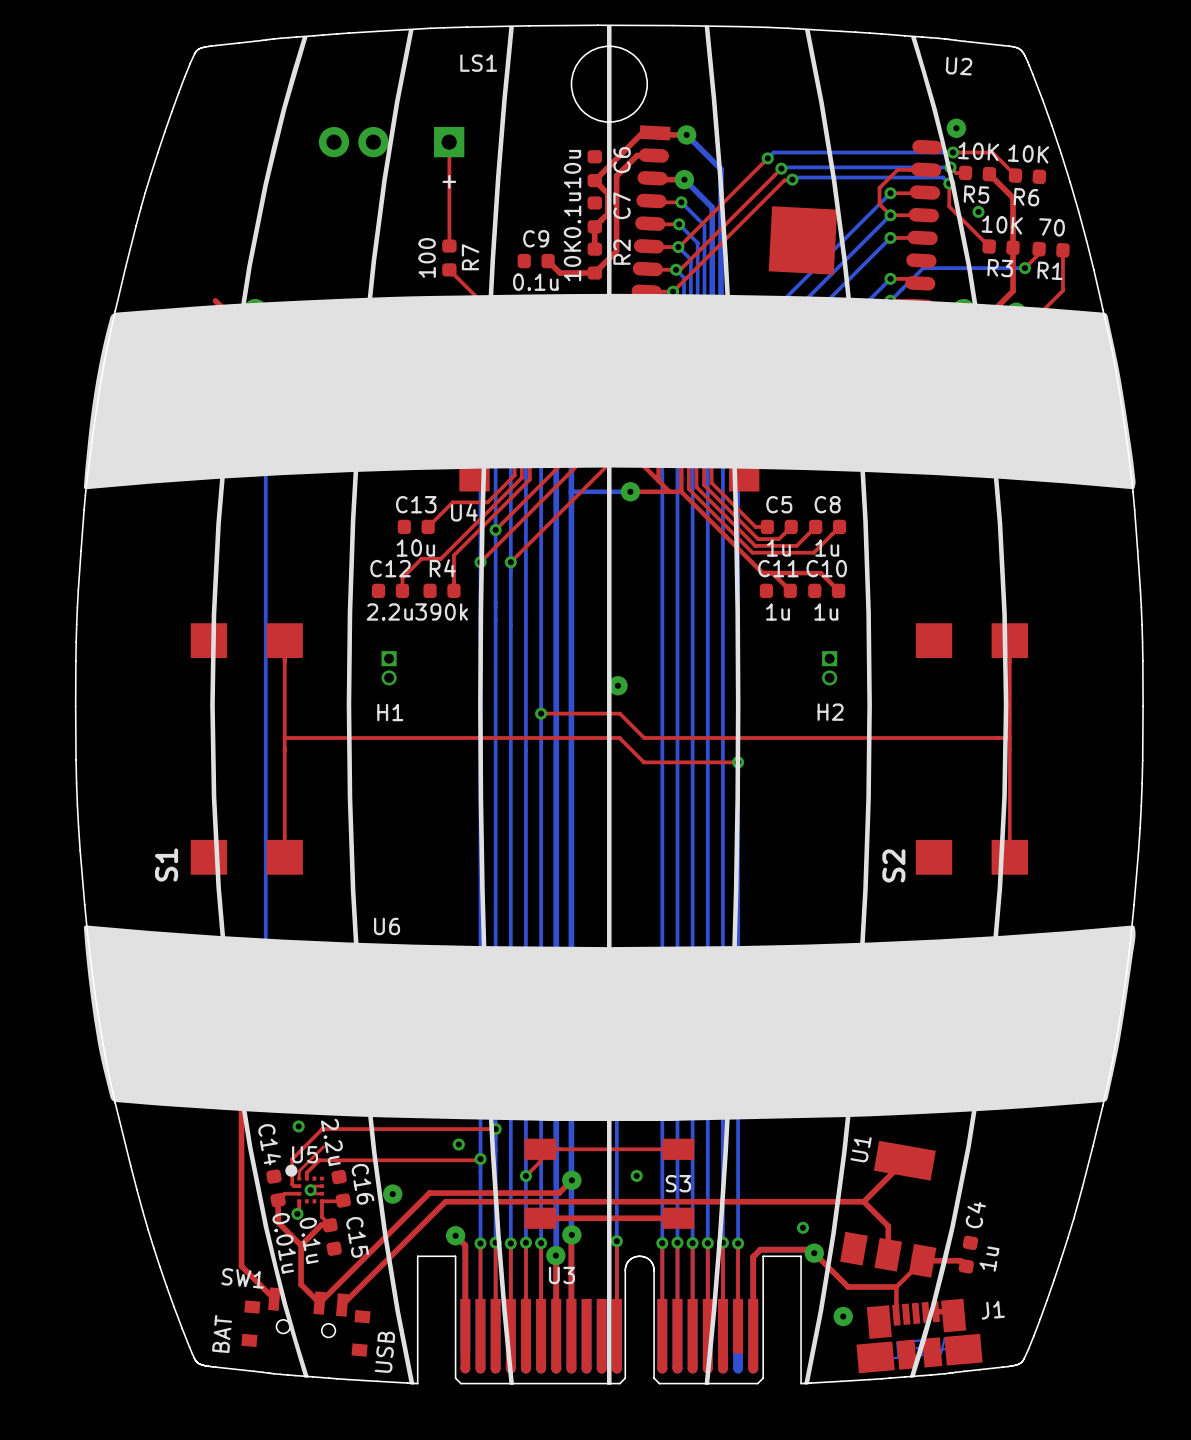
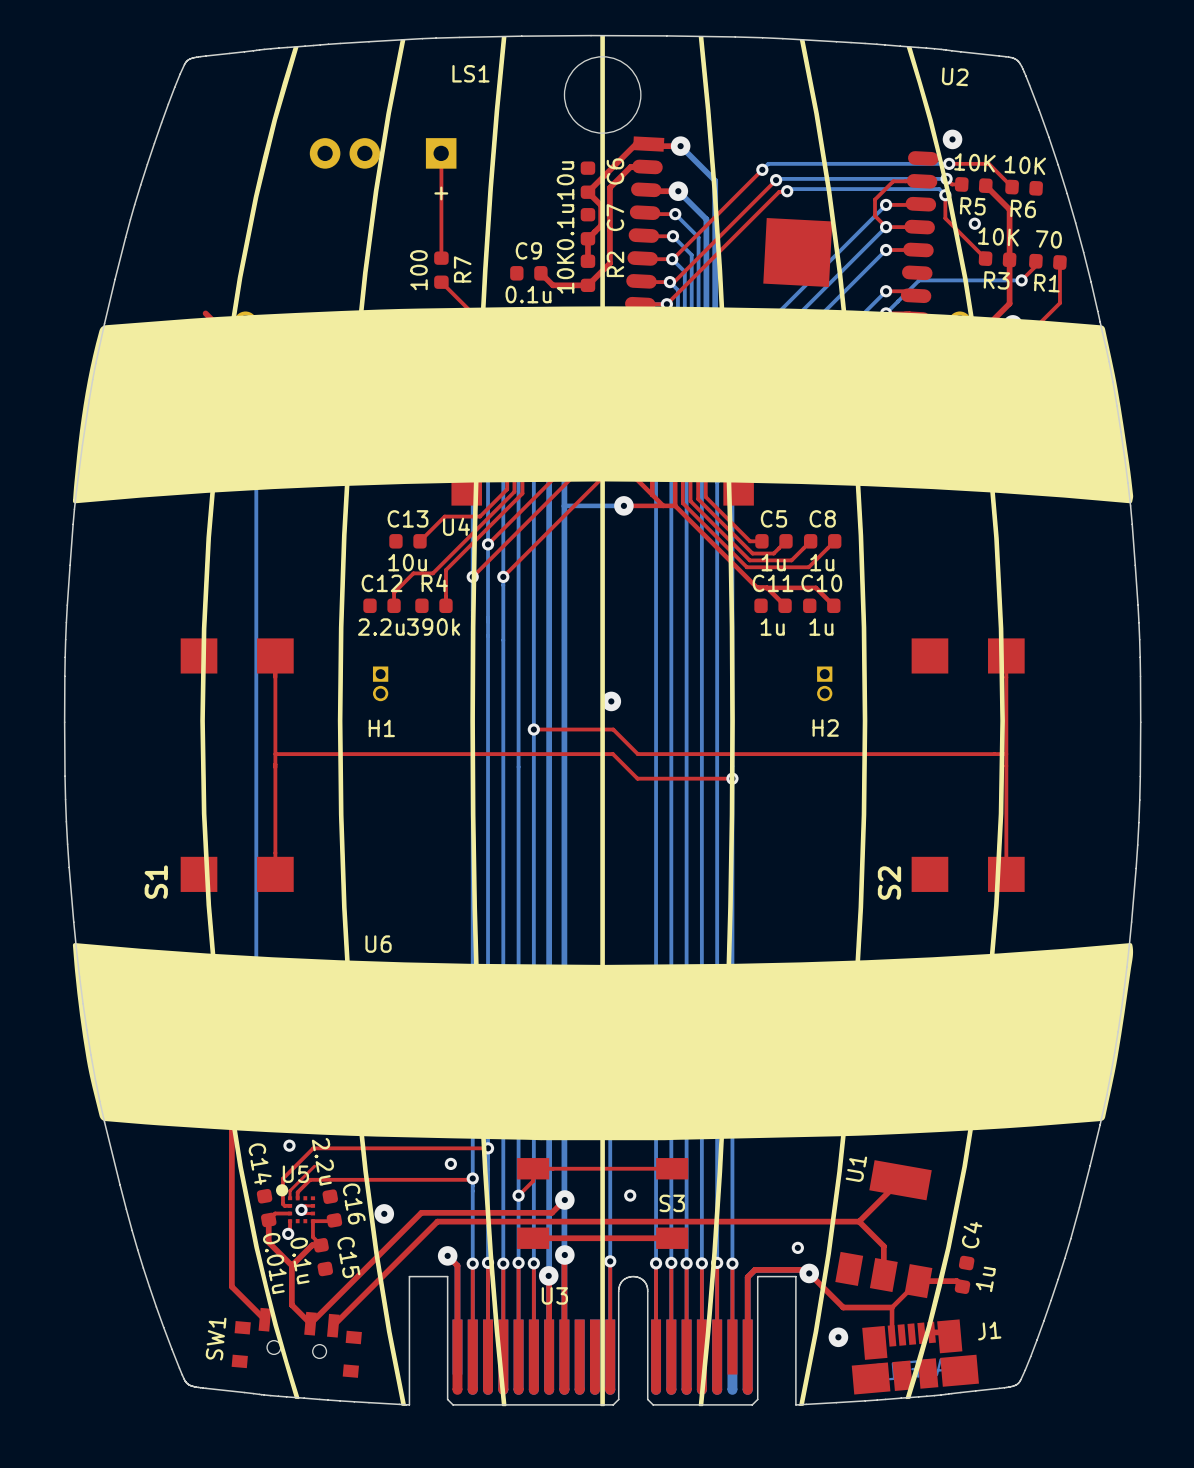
SW1 name rotation: 0° (242, 1278) -> 90° counterclockwise (216, 1339)
text: BAT (222, 1333) -> none
text: USB (384, 1352) -> none

